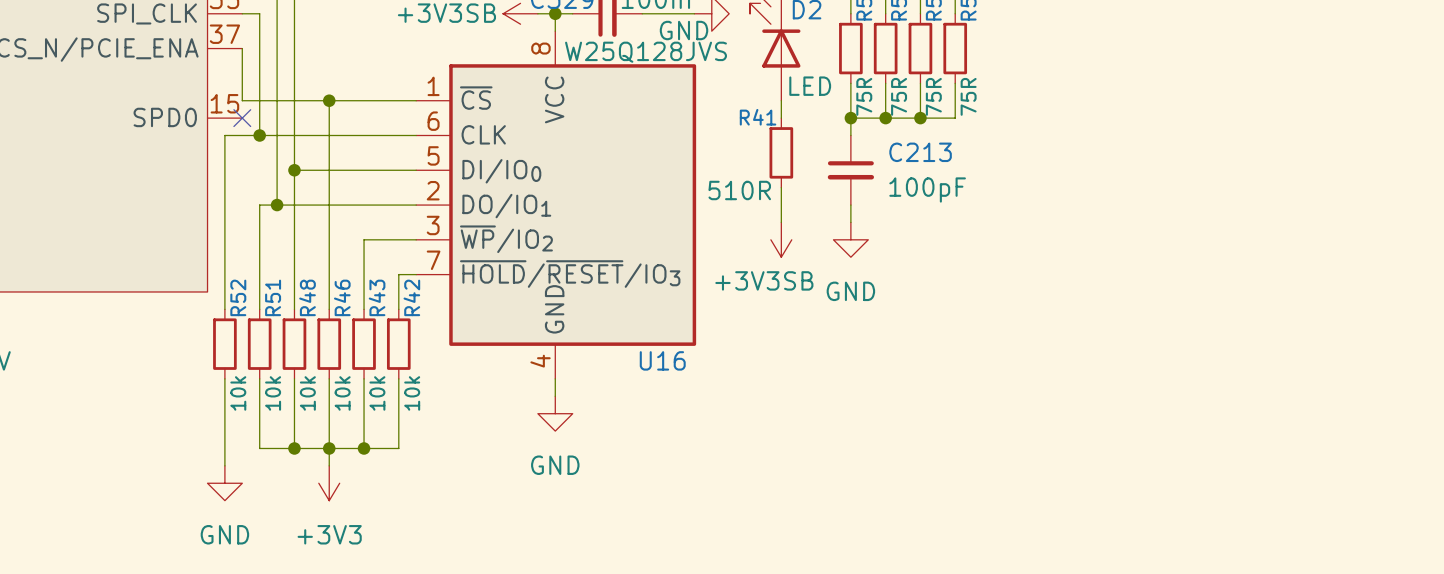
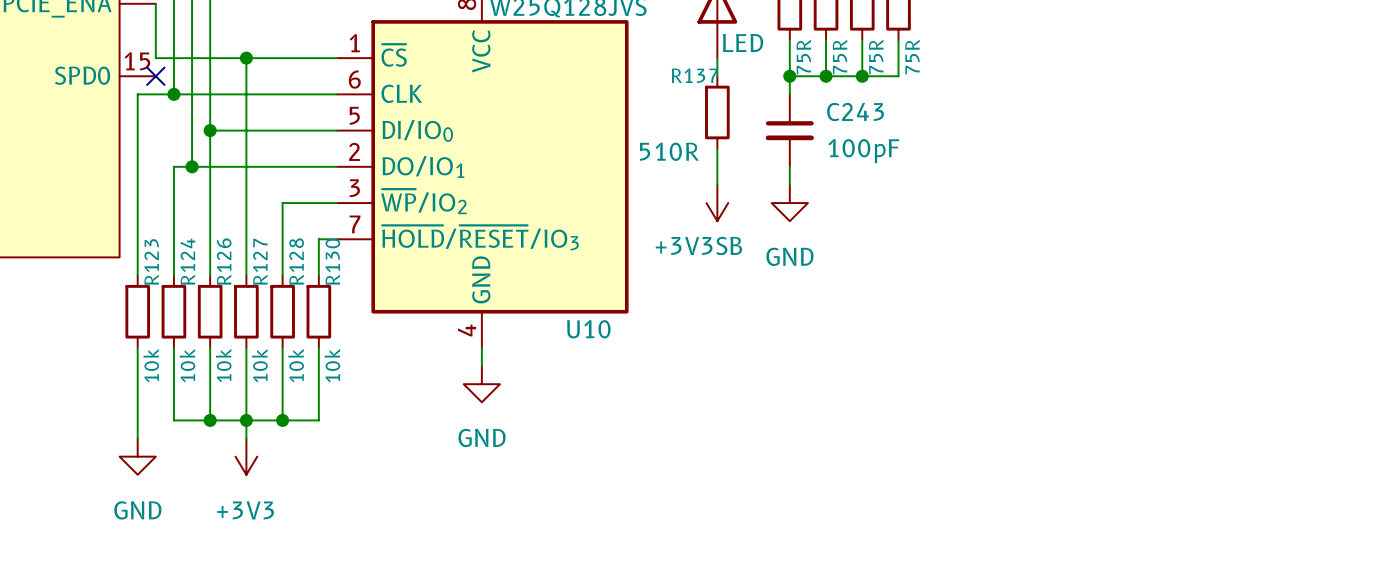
R41 name: R41 (758, 117) -> R137 (694, 75)
C213 name: C213 (920, 152) -> C243 (855, 112)
R52 name: R52 (238, 297) -> R123 (151, 262)
R51 name: R51 (273, 297) -> R124 (187, 261)
R48 name: R48 (307, 297) -> R126 (224, 261)
R46 name: R46 (342, 297) -> R127 (260, 261)
R43 name: R43 (377, 297) -> R128 (296, 261)
R42 name: R42 (411, 297) -> R130 (332, 261)
U16 name: U16 (662, 360) -> U10 (588, 329)

